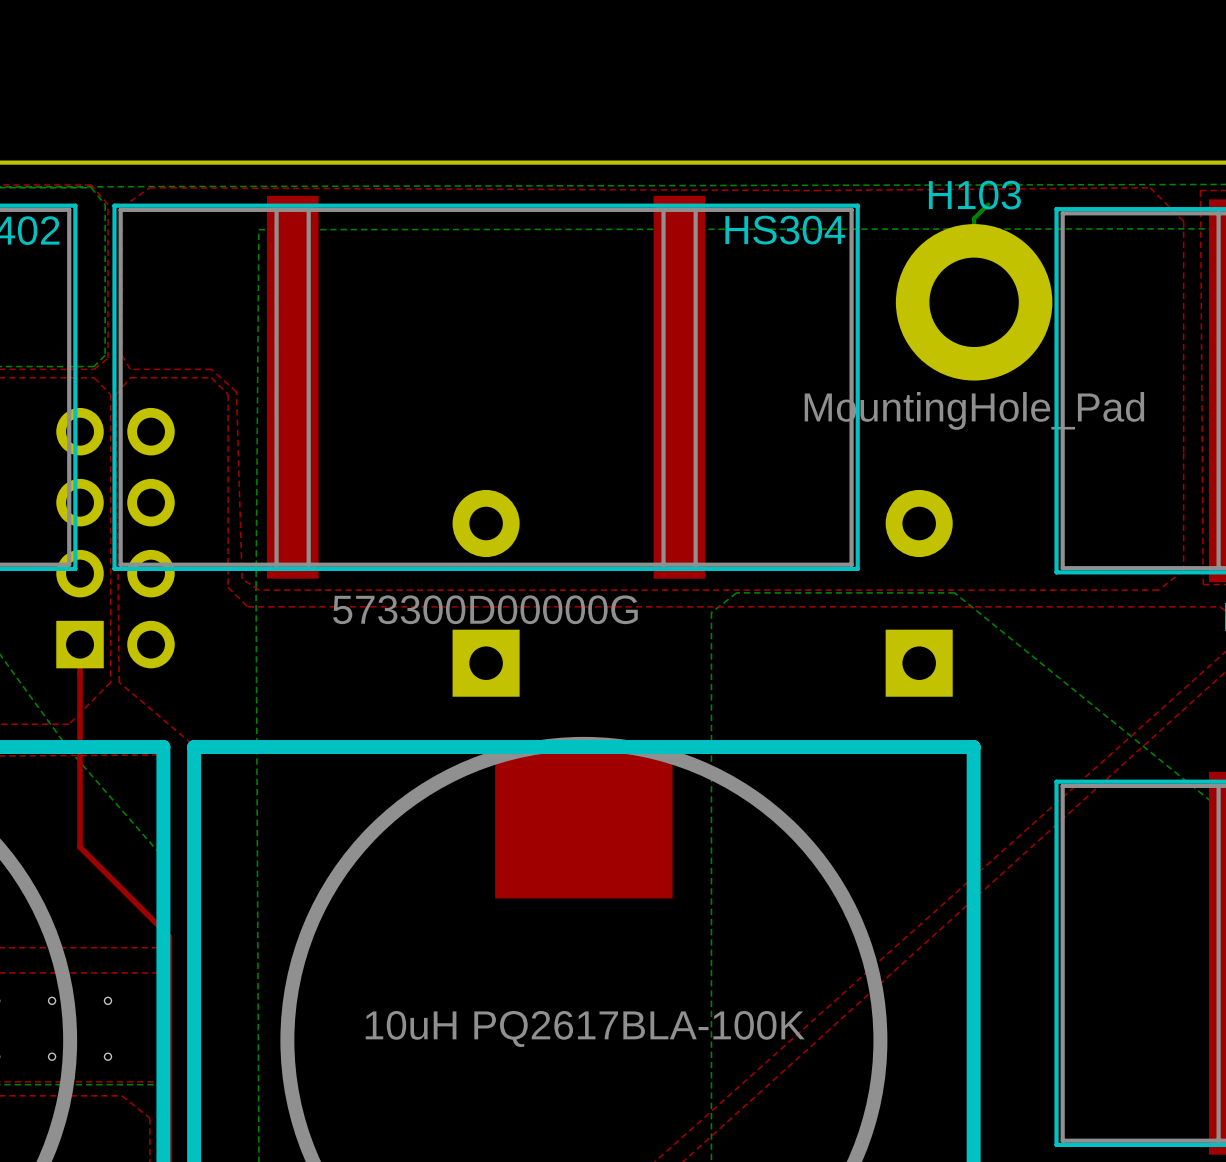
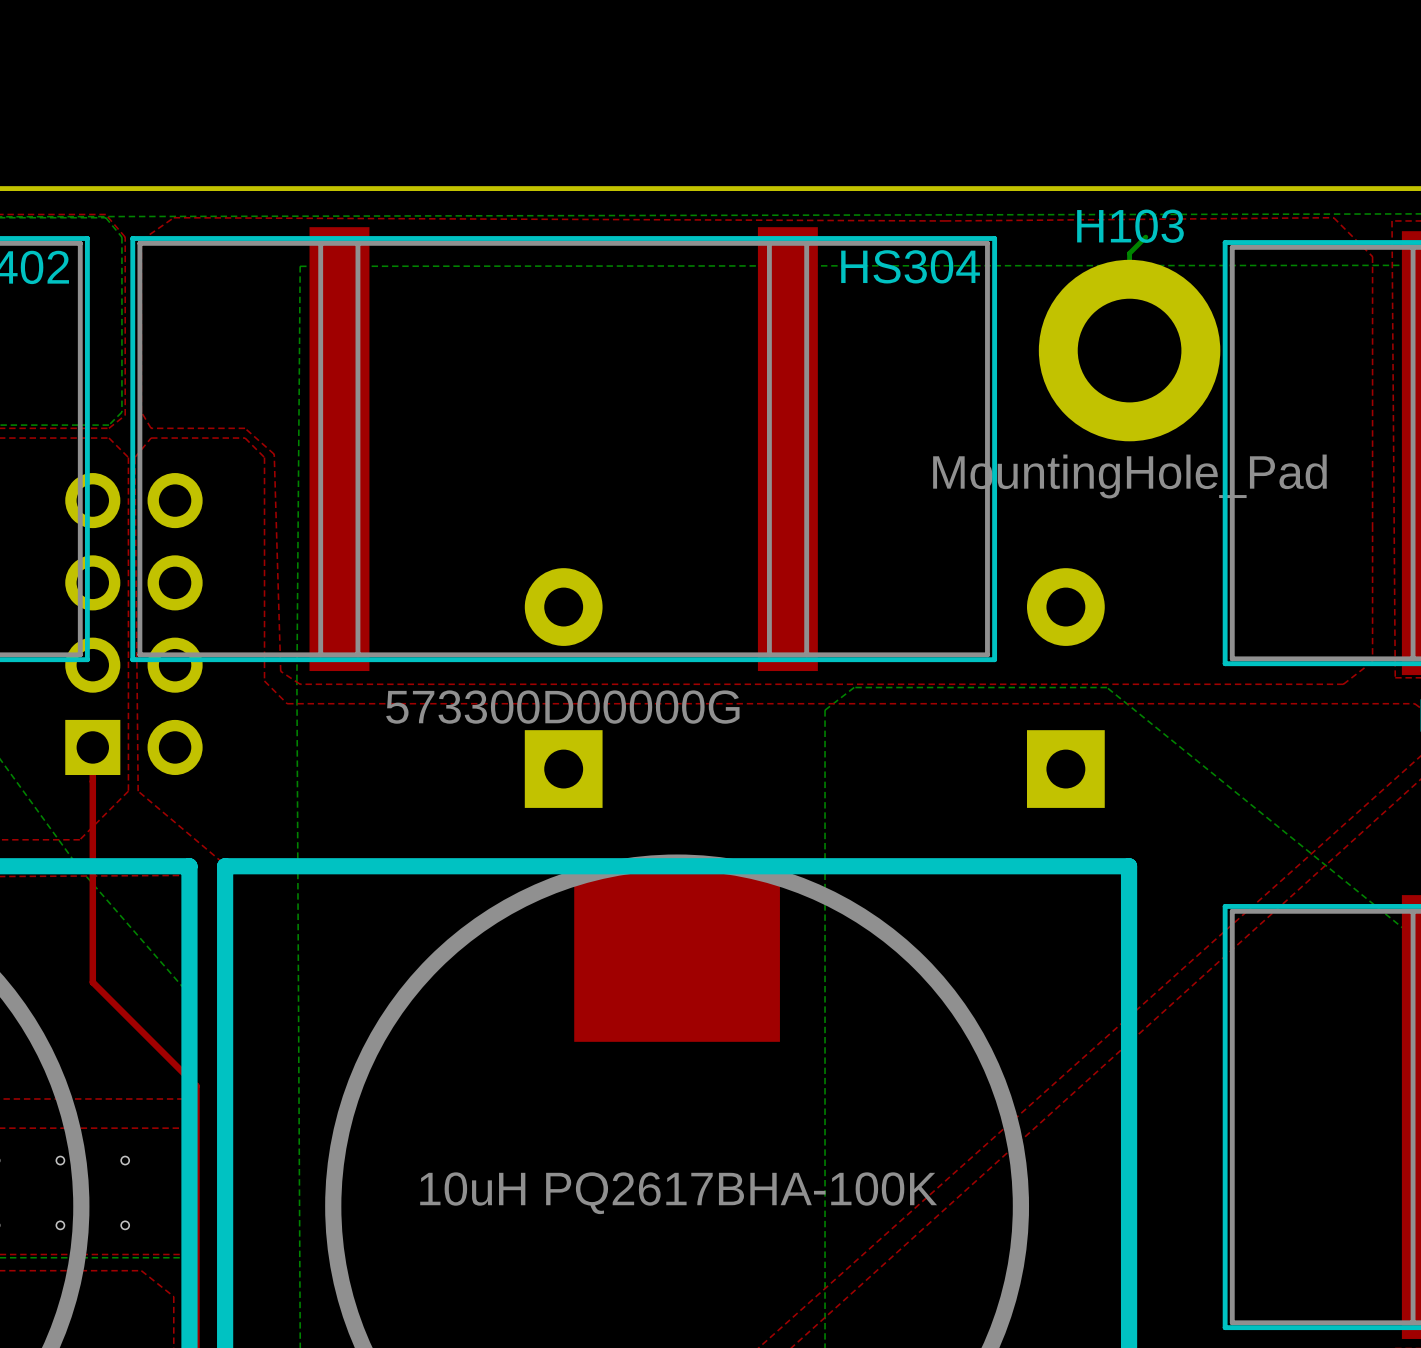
part value: 10uH PQ2617BLA-100K (585, 1029) -> 10uH PQ2617BHA-100K (678, 1193)

